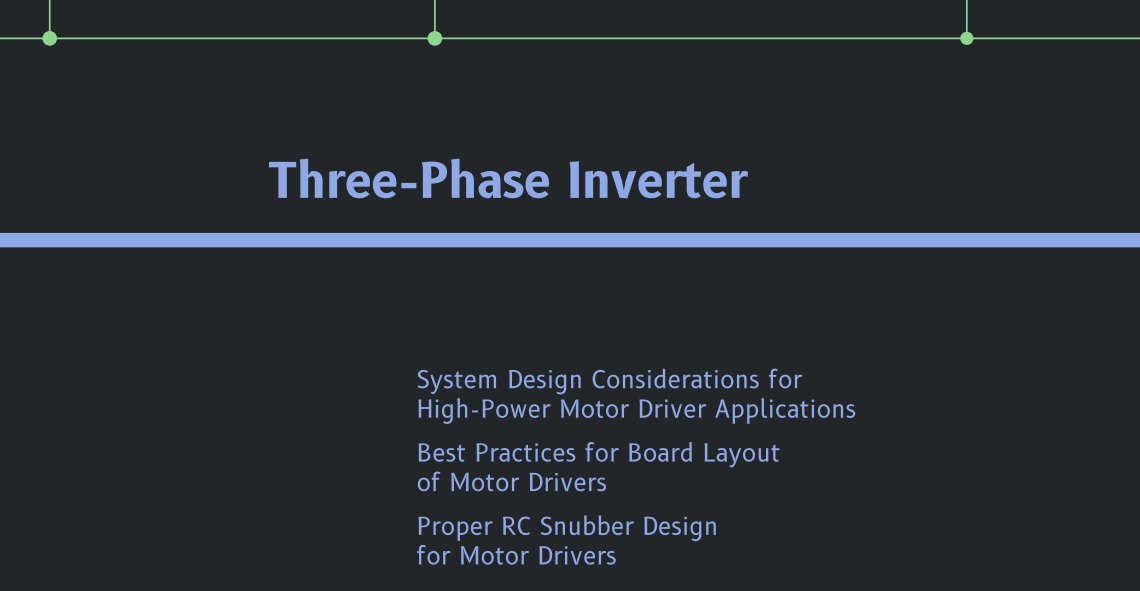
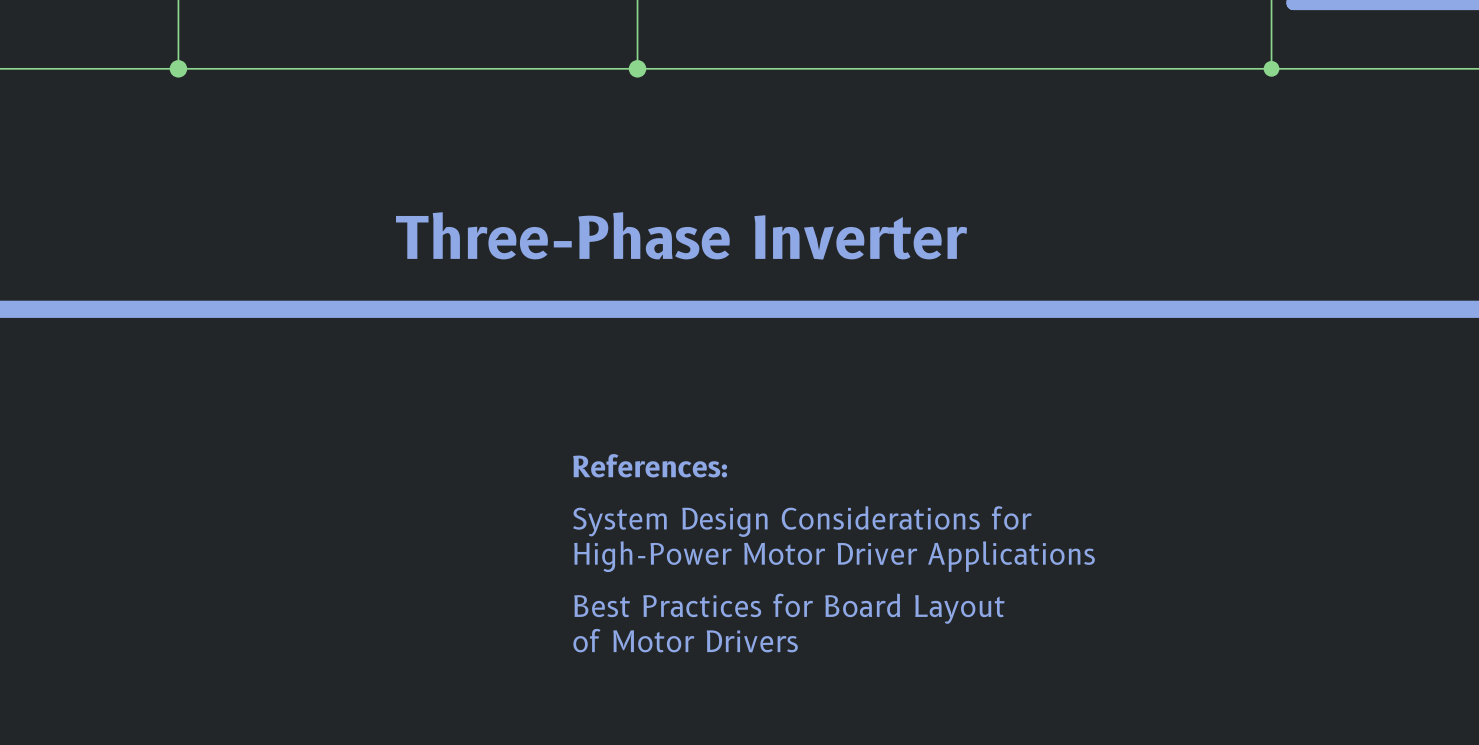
text position: Three-Phase Inverter (508, 178) -> Three-Phase Inverter (681, 235)
text: none -> References: (650, 465)
text position: System Design Considerations for (609, 381) -> System Design Considerations for (802, 521)
text position: High-Power Motor Driver Applications (636, 411) -> High-Power Motor Driver Applications (834, 556)
text position: Best Practices for Board Layout (598, 454) -> Best Practices for Board Layout (789, 608)
text position: of Motor Drivers (511, 481) -> of Motor Drivers (685, 640)
text: Proper RC Snubber Design (567, 528) -> none
text: for Motor Drivers (516, 554) -> none

